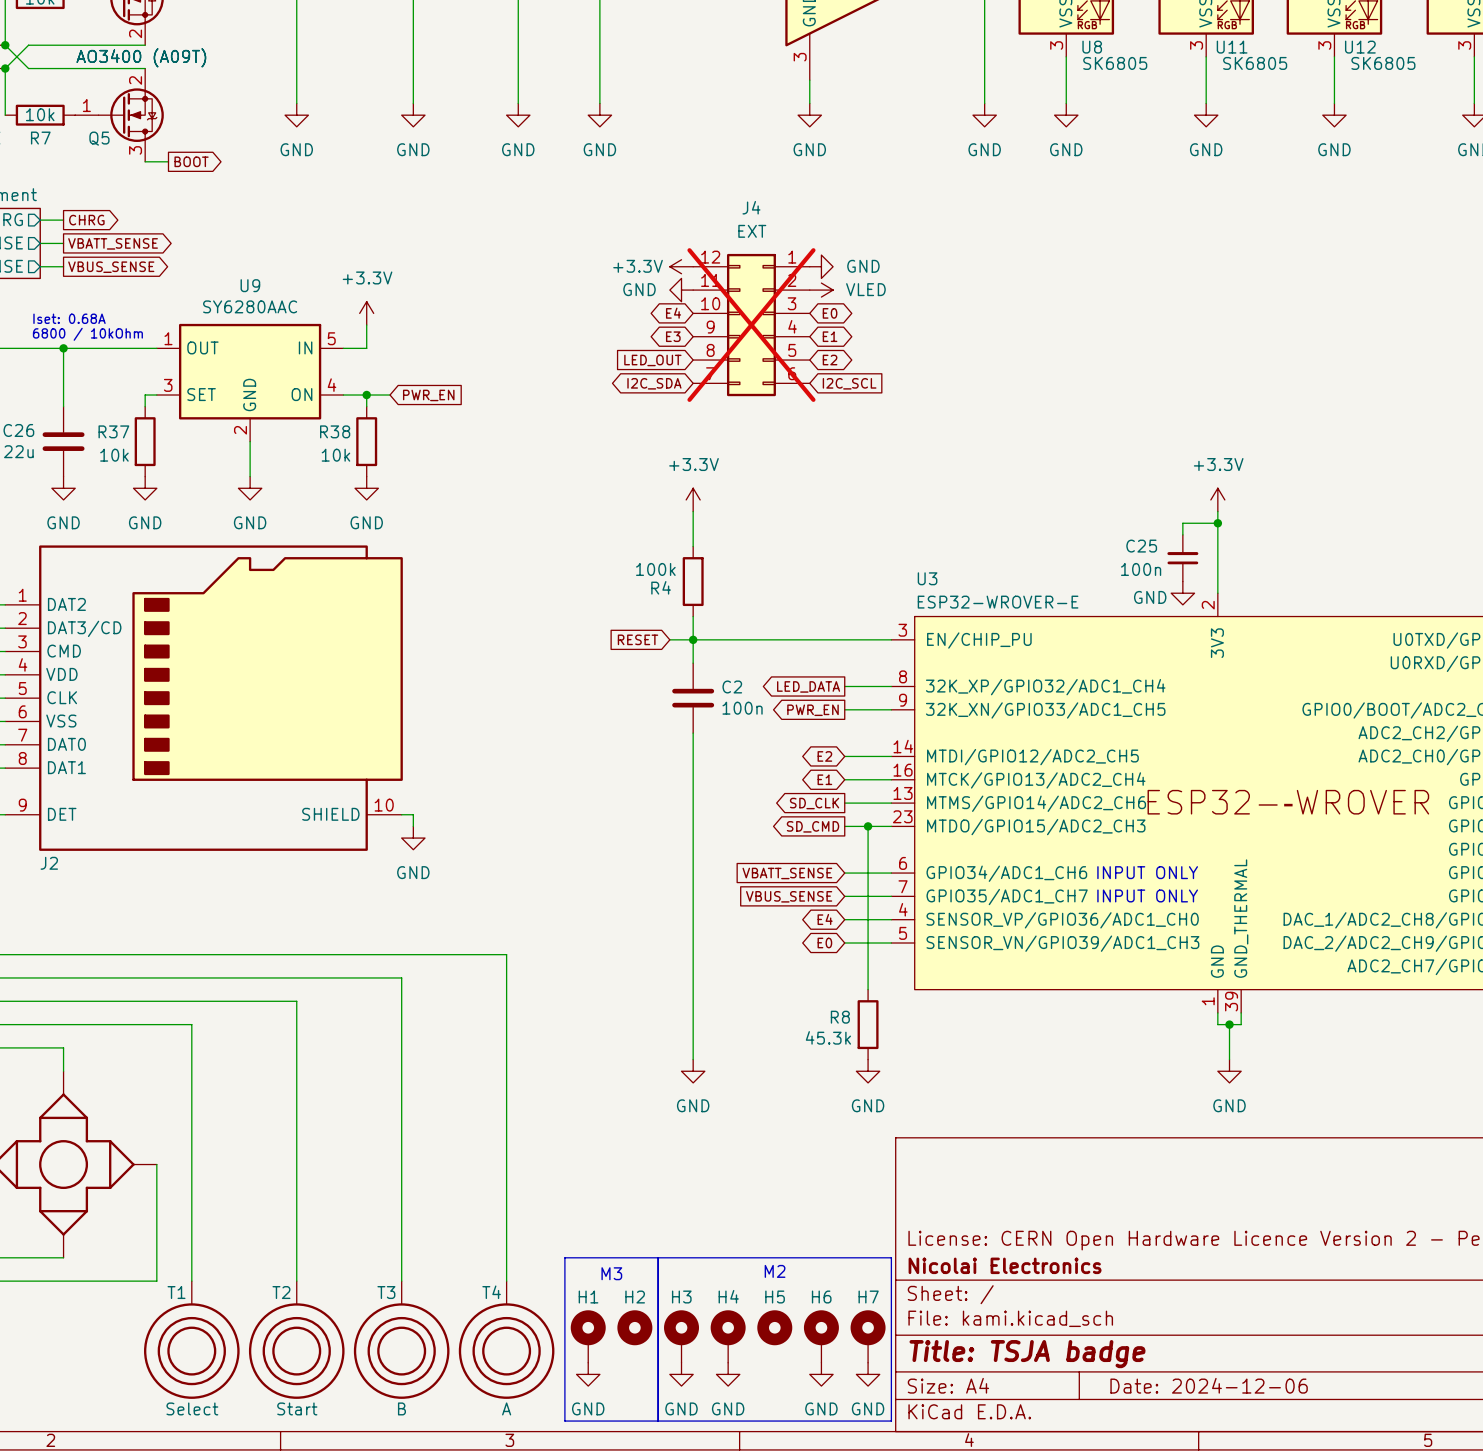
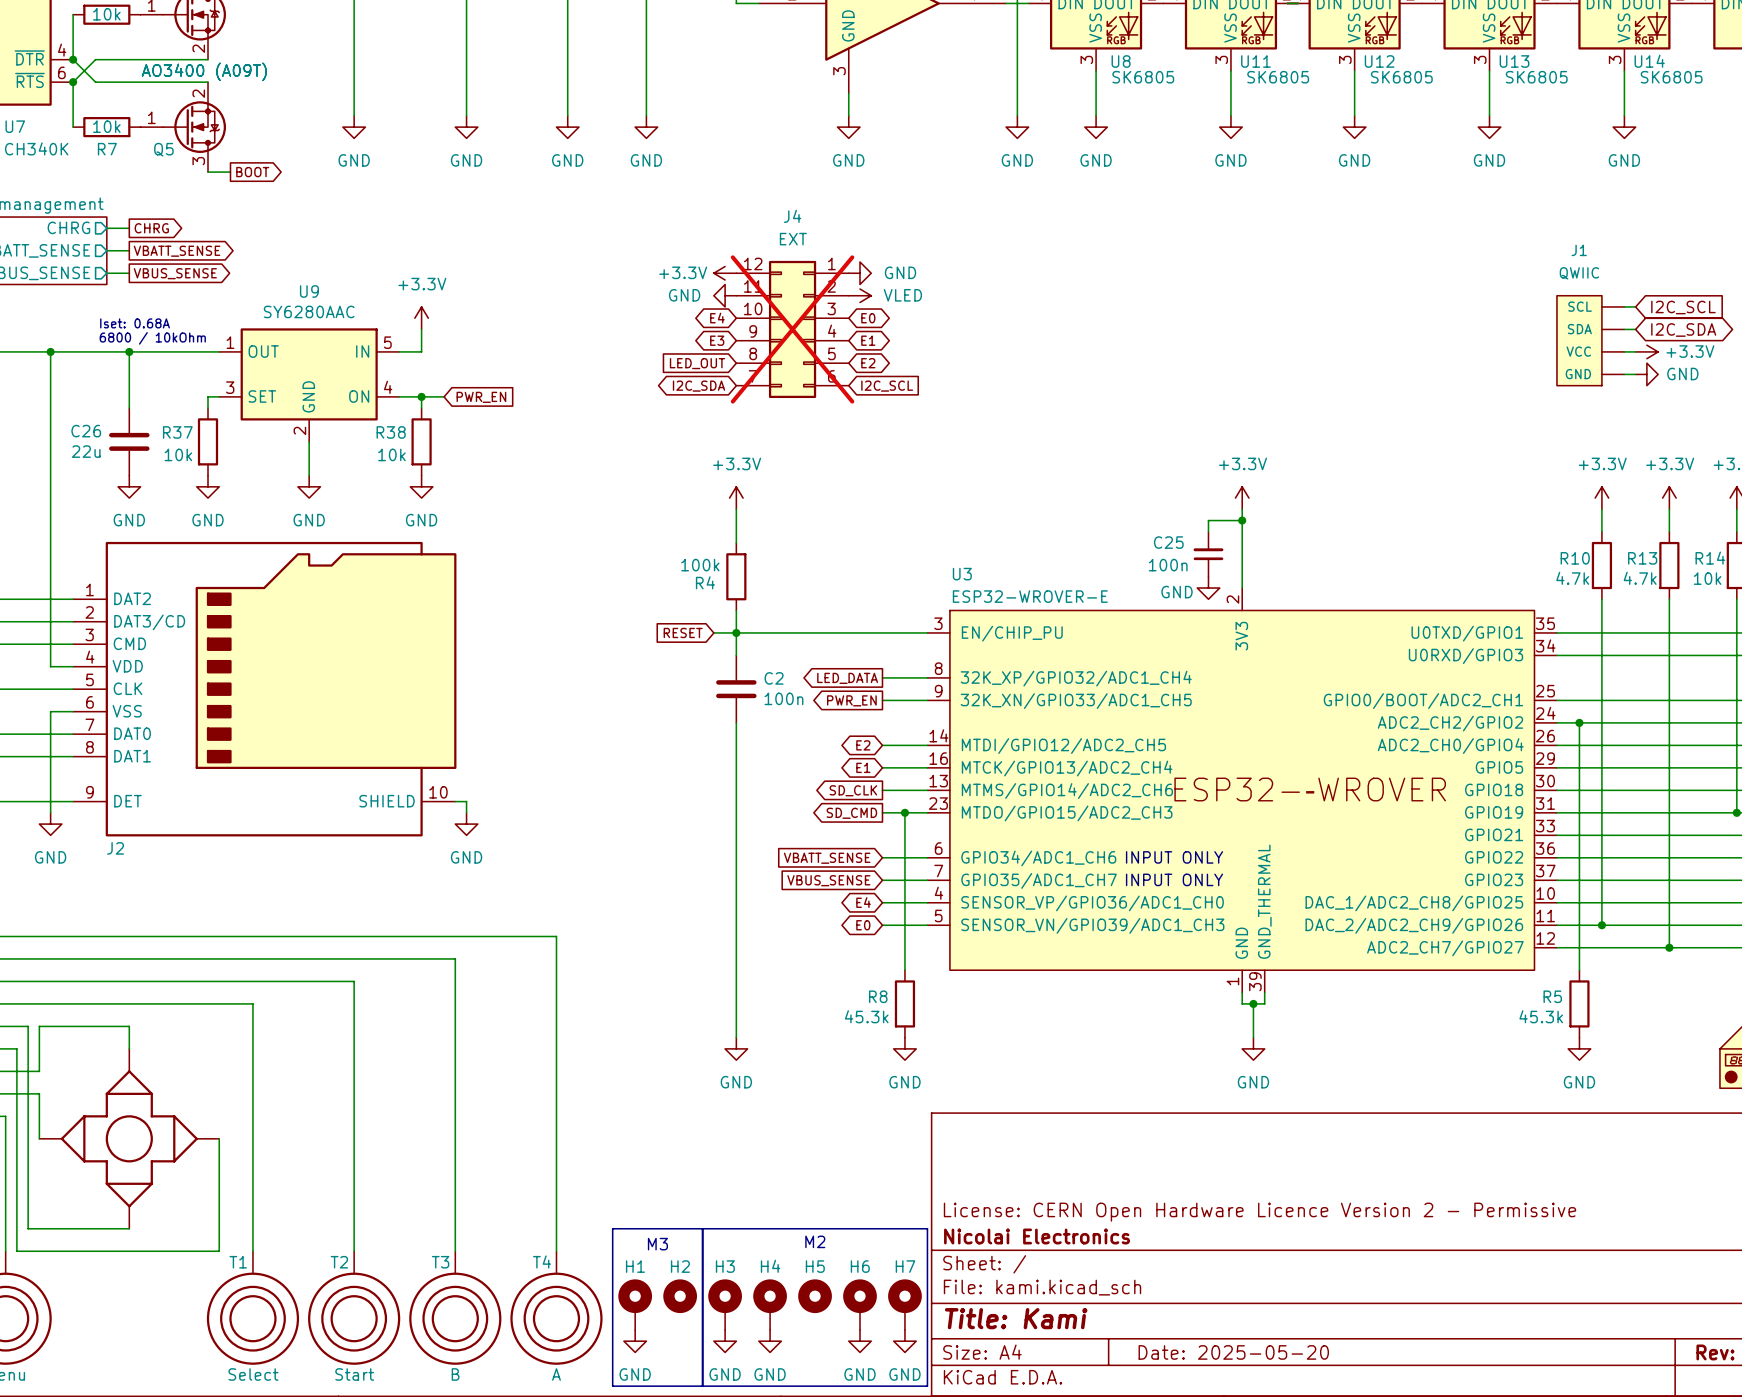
title block: Title: TSJA badge (1027, 1354) -> Title: Kami (1016, 1318)
title block: Date: 2024-12-06 (1209, 1385) -> Date: 2025-05-20 (1233, 1352)

